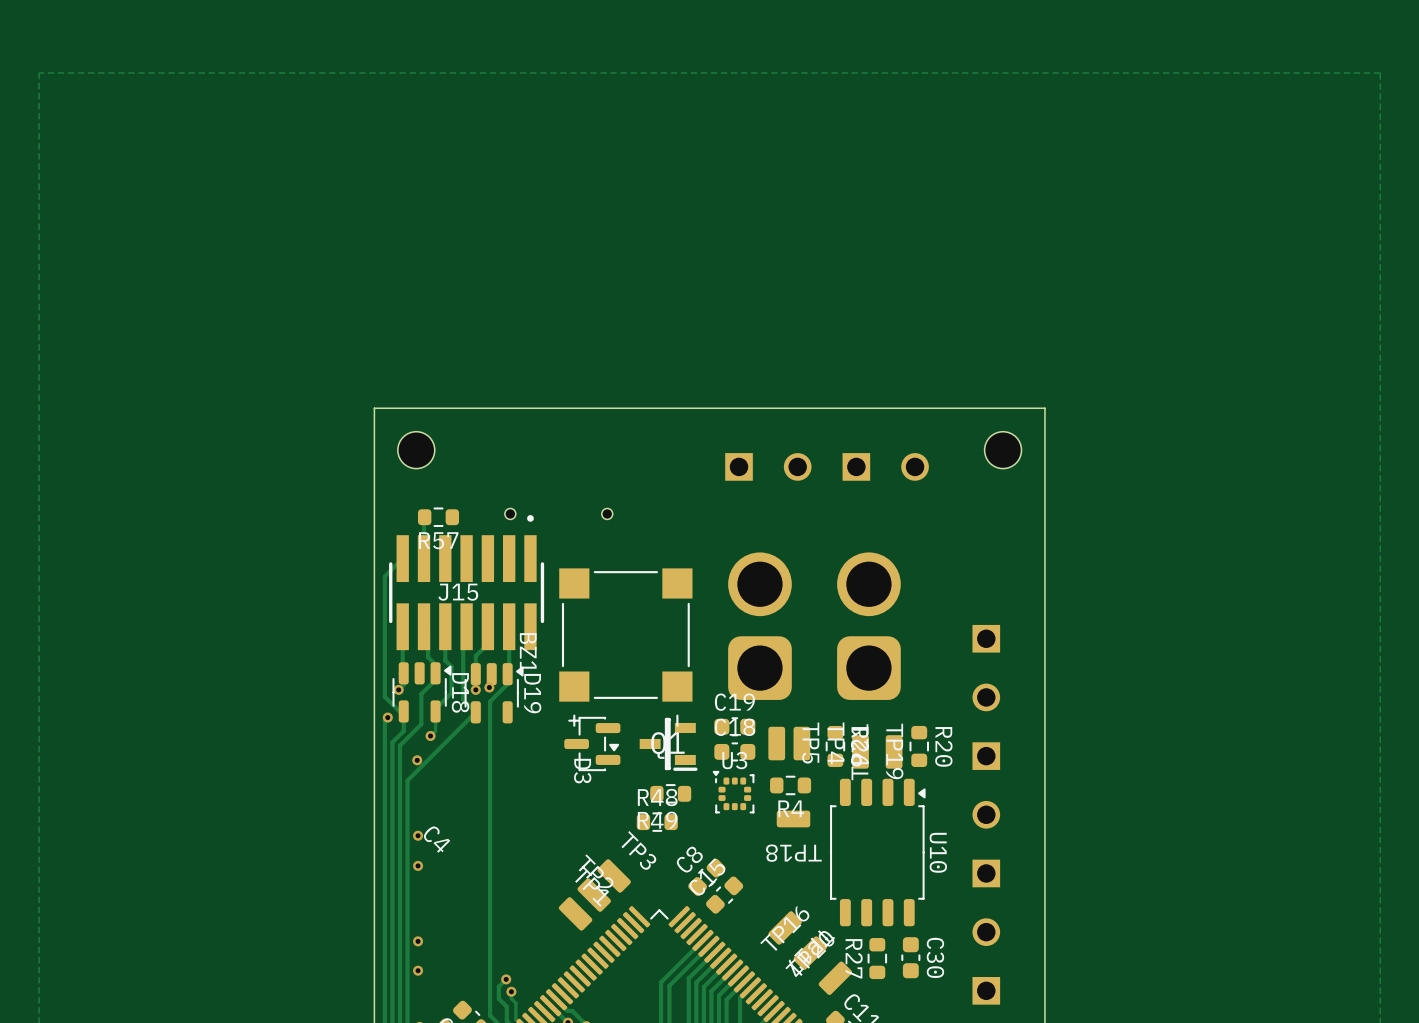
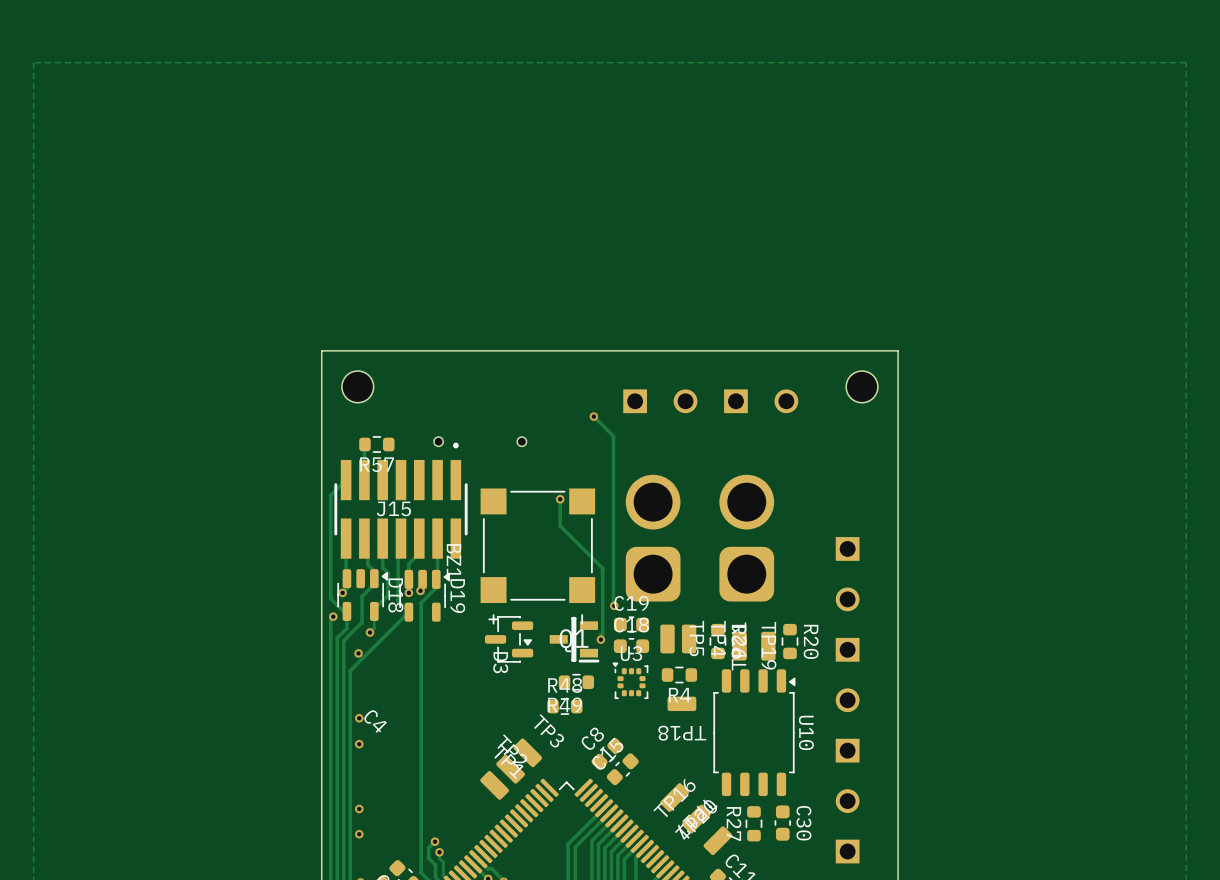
track: none -> (593, 416) (613, 436) (614, 605)
via: none -> (593, 416)
track: none -> (560, 499) (560, 525) (602, 568) (602, 634) (600, 634) (600, 639) (602, 637)
via: none -> (560, 499)
via: none -> (614, 605)
via: none -> (600, 639)

